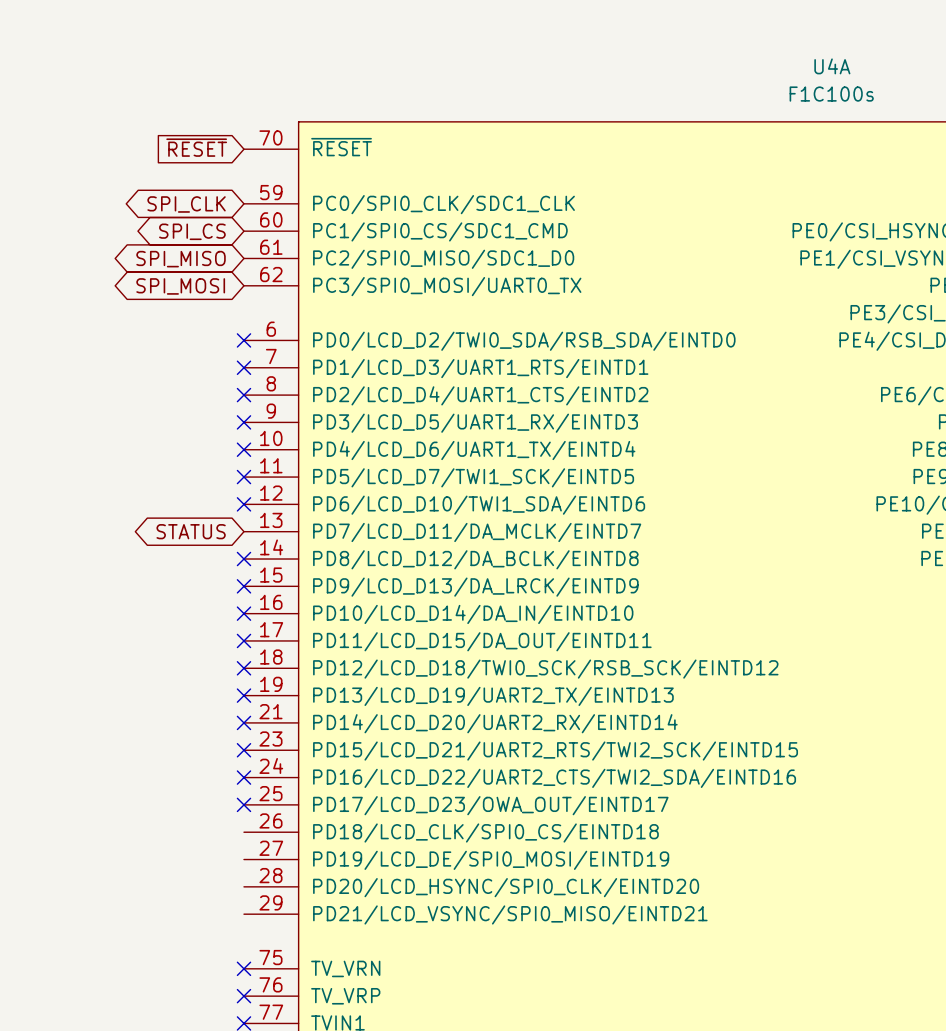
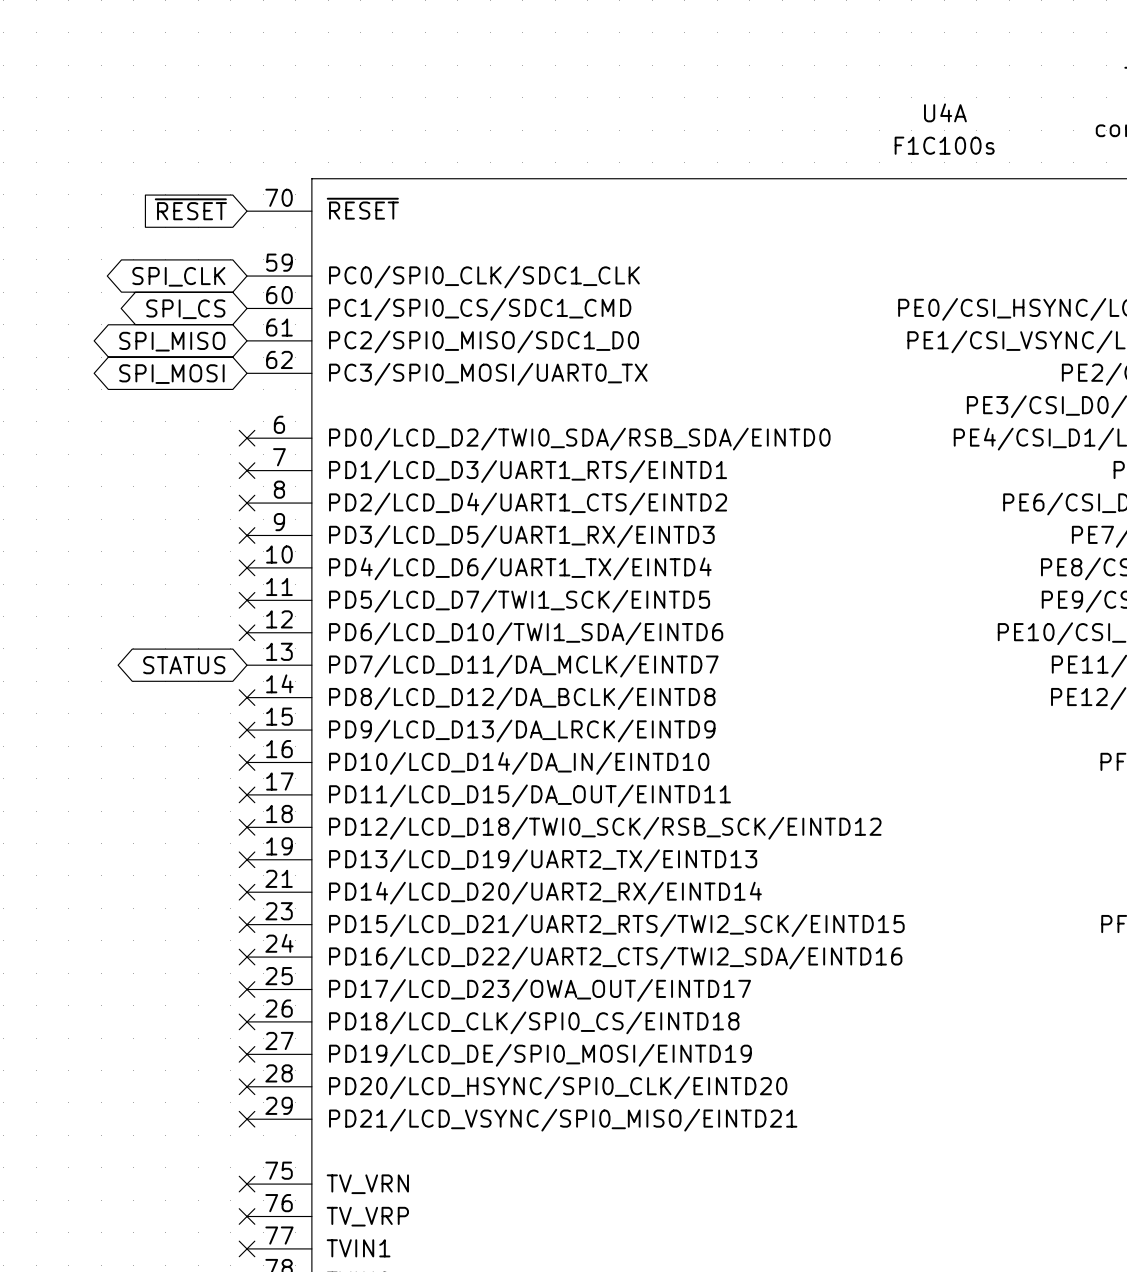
no-connect mark: none -> (247, 1021)
no-connect mark: none -> (247, 1054)
no-connect mark: none -> (247, 1086)
no-connect mark: none -> (247, 1119)

